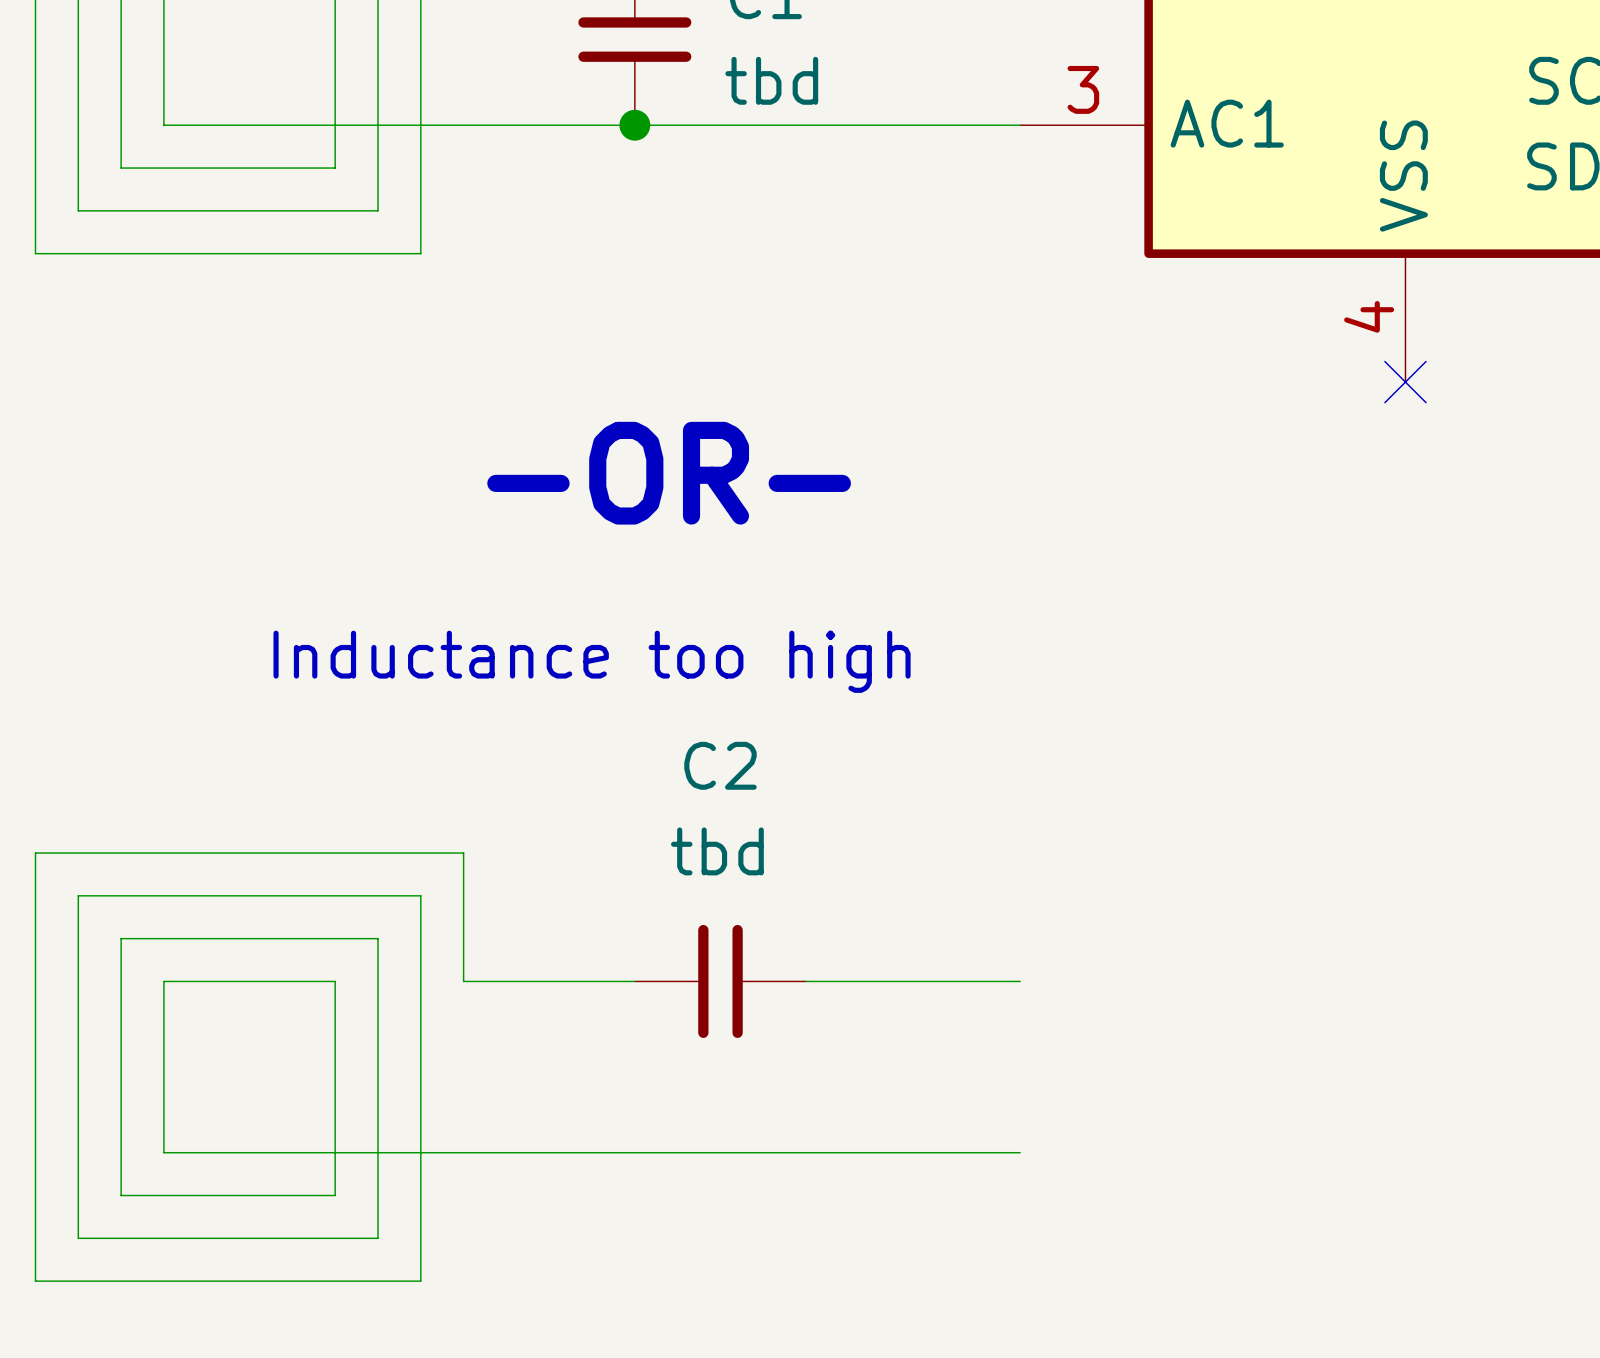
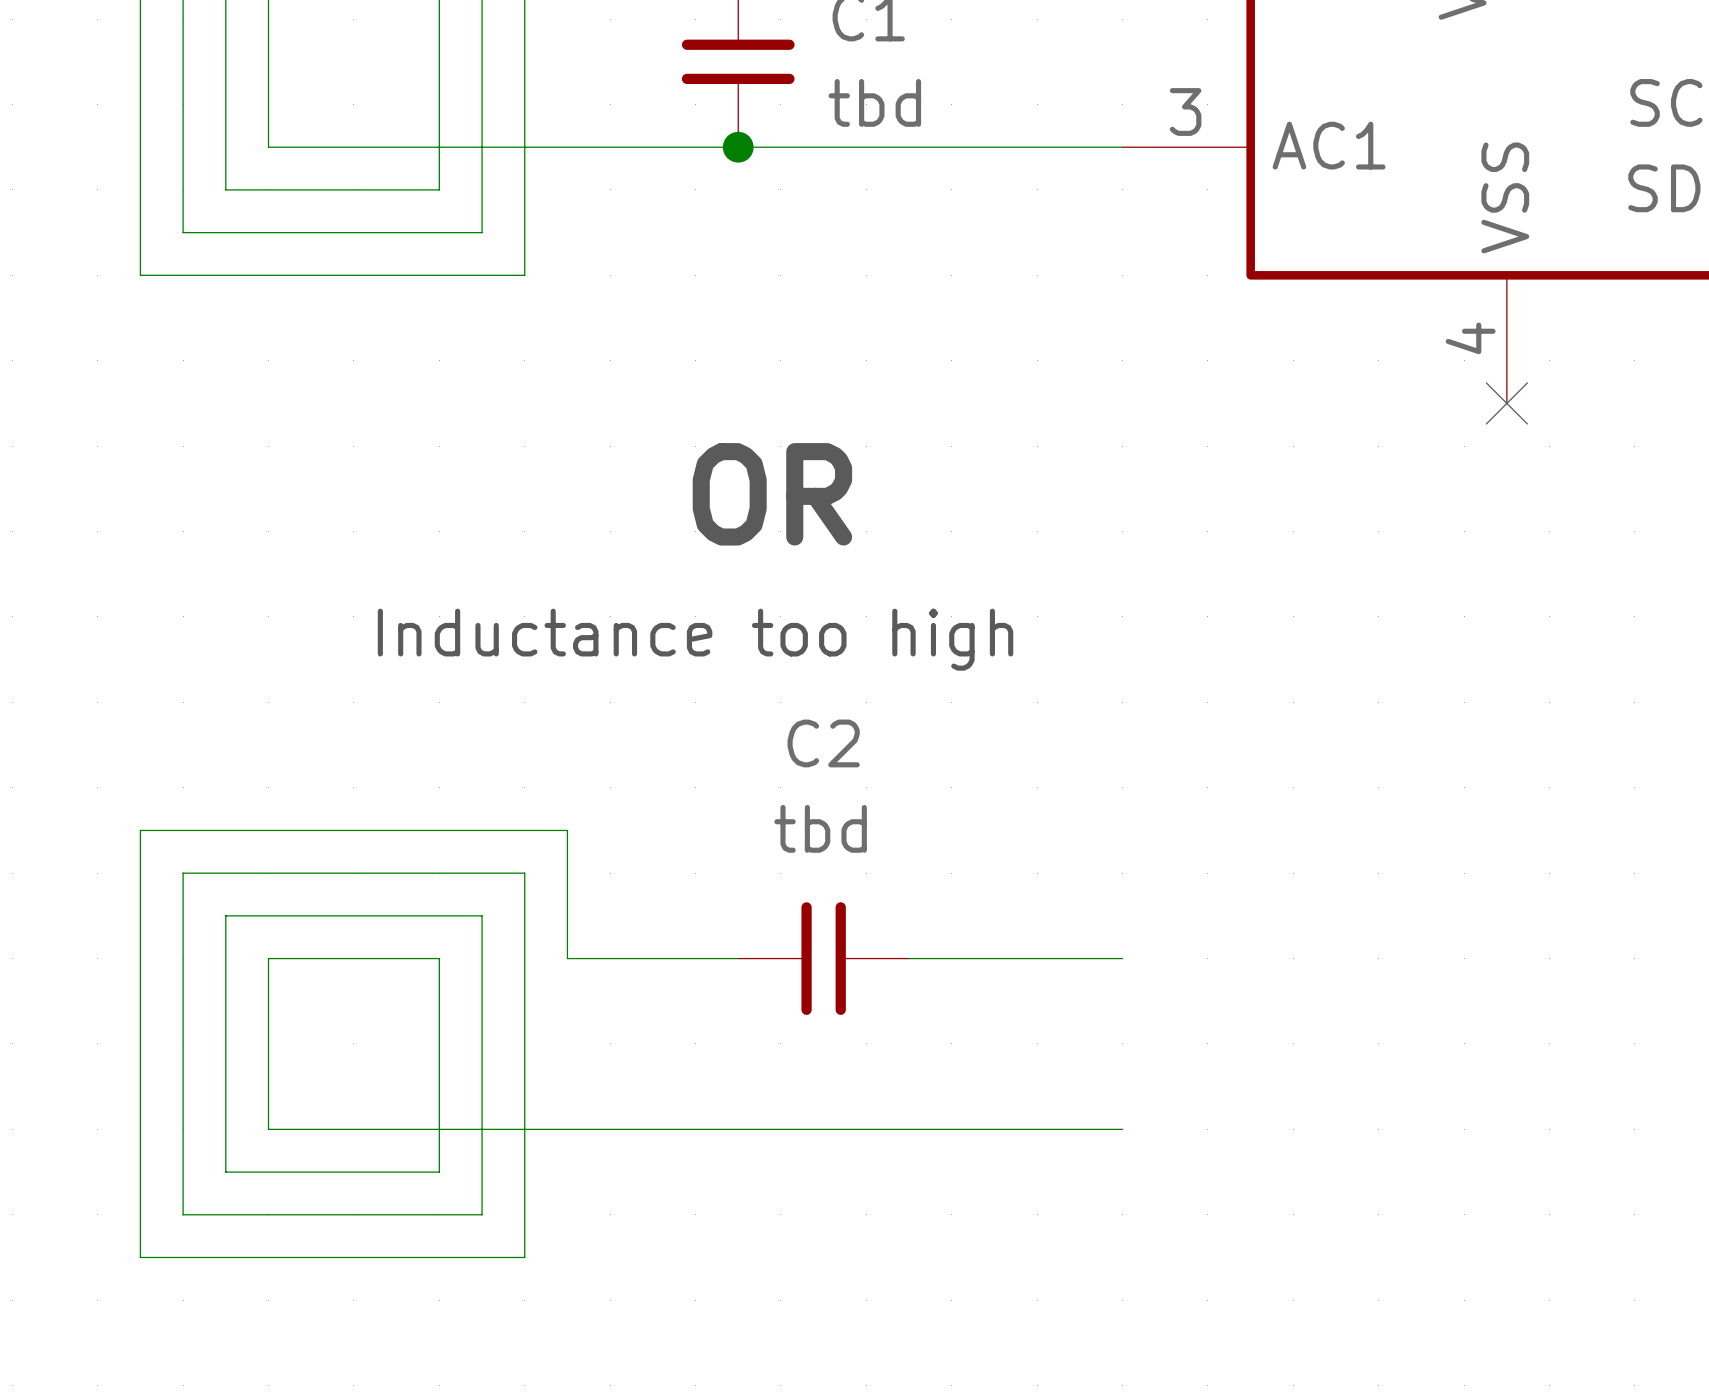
text: -OR- (669, 473) -> OR (772, 494)
text position: Inductance too high (592, 661) -> Inductance too high (695, 639)
wire: (35, 853) (78, 853) -> (183, 915) (183, 873)
wire: none -> (140, 873) (140, 830) (567, 830) (567, 873)
wire: (420, 853) (463, 853) -> (524, 873) (524, 915)
wire: (78, 895) (121, 895) -> none
wire: (377, 895) (420, 895) -> (183, 1214) (225, 1214)
wire: (121, 938) (163, 938) -> (225, 958) (225, 915)
wire: (335, 938) (377, 938) -> (482, 915) (482, 958)
wire: none -> (439, 958) (439, 1001)
wire: (463, 938) (463, 981) (634, 981) -> (567, 958) (738, 958)
wire: (163, 981) (335, 981) -> (268, 1001) (268, 958)
C2 position: (720, 981) -> (823, 958)
wire: (806, 981) (1020, 981) -> (909, 958) (1122, 958)
wire: (163, 1109) (163, 1152) -> (268, 1129) (1122, 1129)
wire: (121, 1152) (121, 1195) -> (225, 1172) (268, 1172)
wire: (1020, 1152) (335, 1152) (335, 1195) -> none
wire: (78, 1195) (78, 1238) -> (140, 1257) (183, 1257)
wire: (377, 1195) (377, 1238) -> (482, 1214) (439, 1214)
wire: (35, 1238) (35, 1281) (420, 1281) (420, 1238) -> (482, 1257) (524, 1257)

